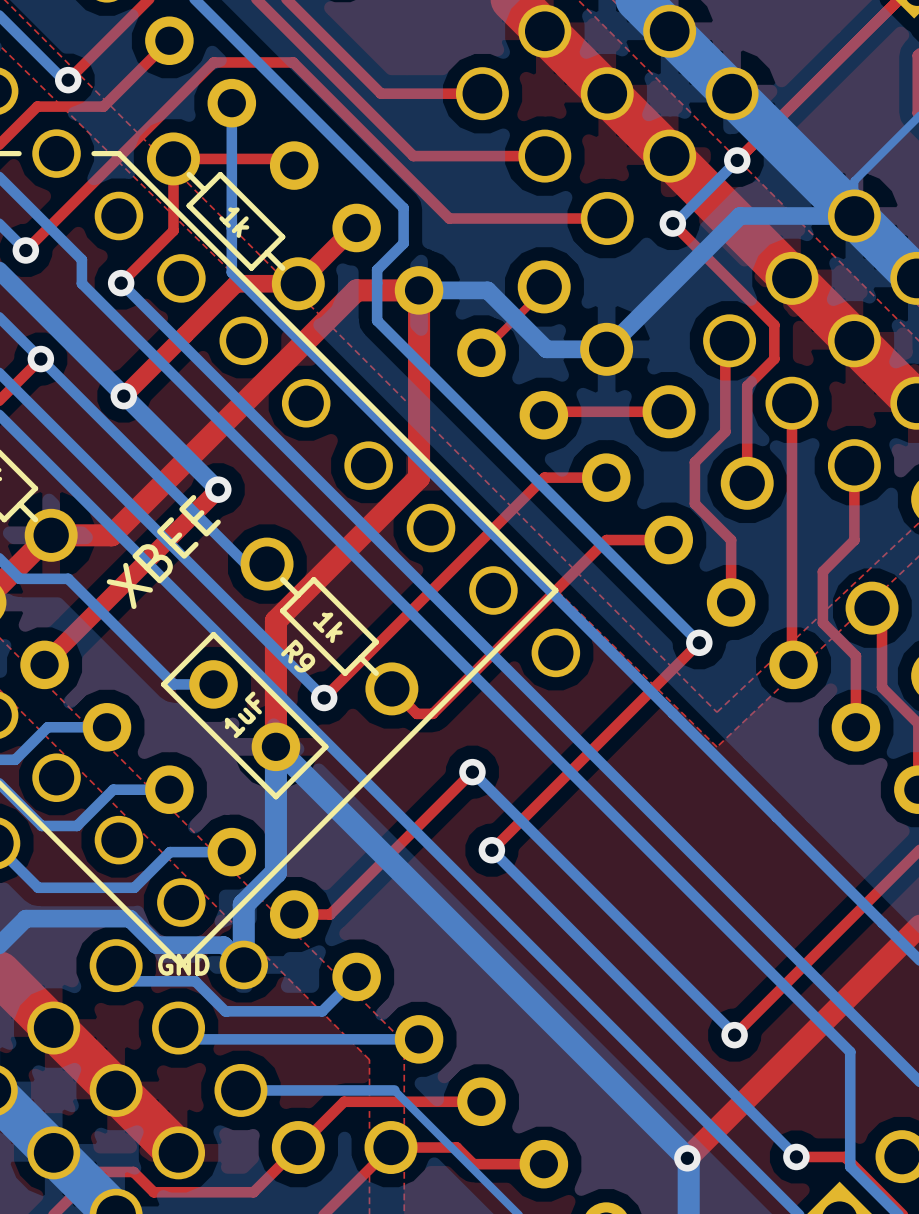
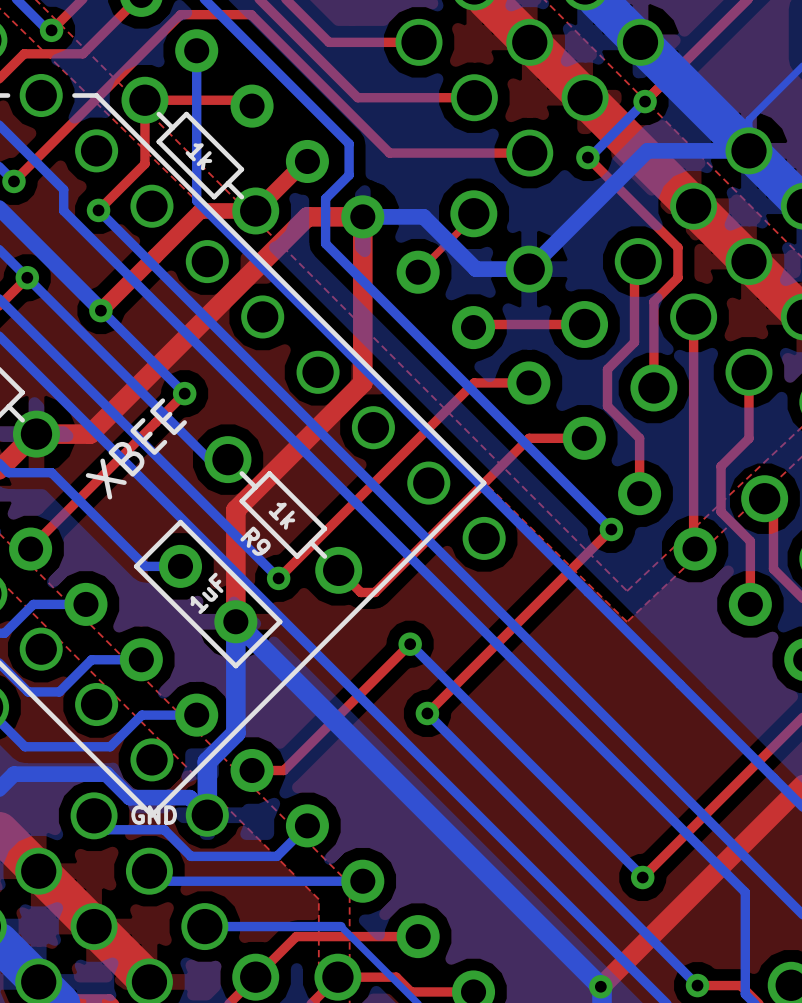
bottom track width: thick (123, 396) (218, 489) -> thin (100, 310) (184, 393)
top track width: thick (218, 489) (44, 664) -> thin (184, 393) (30, 549)

